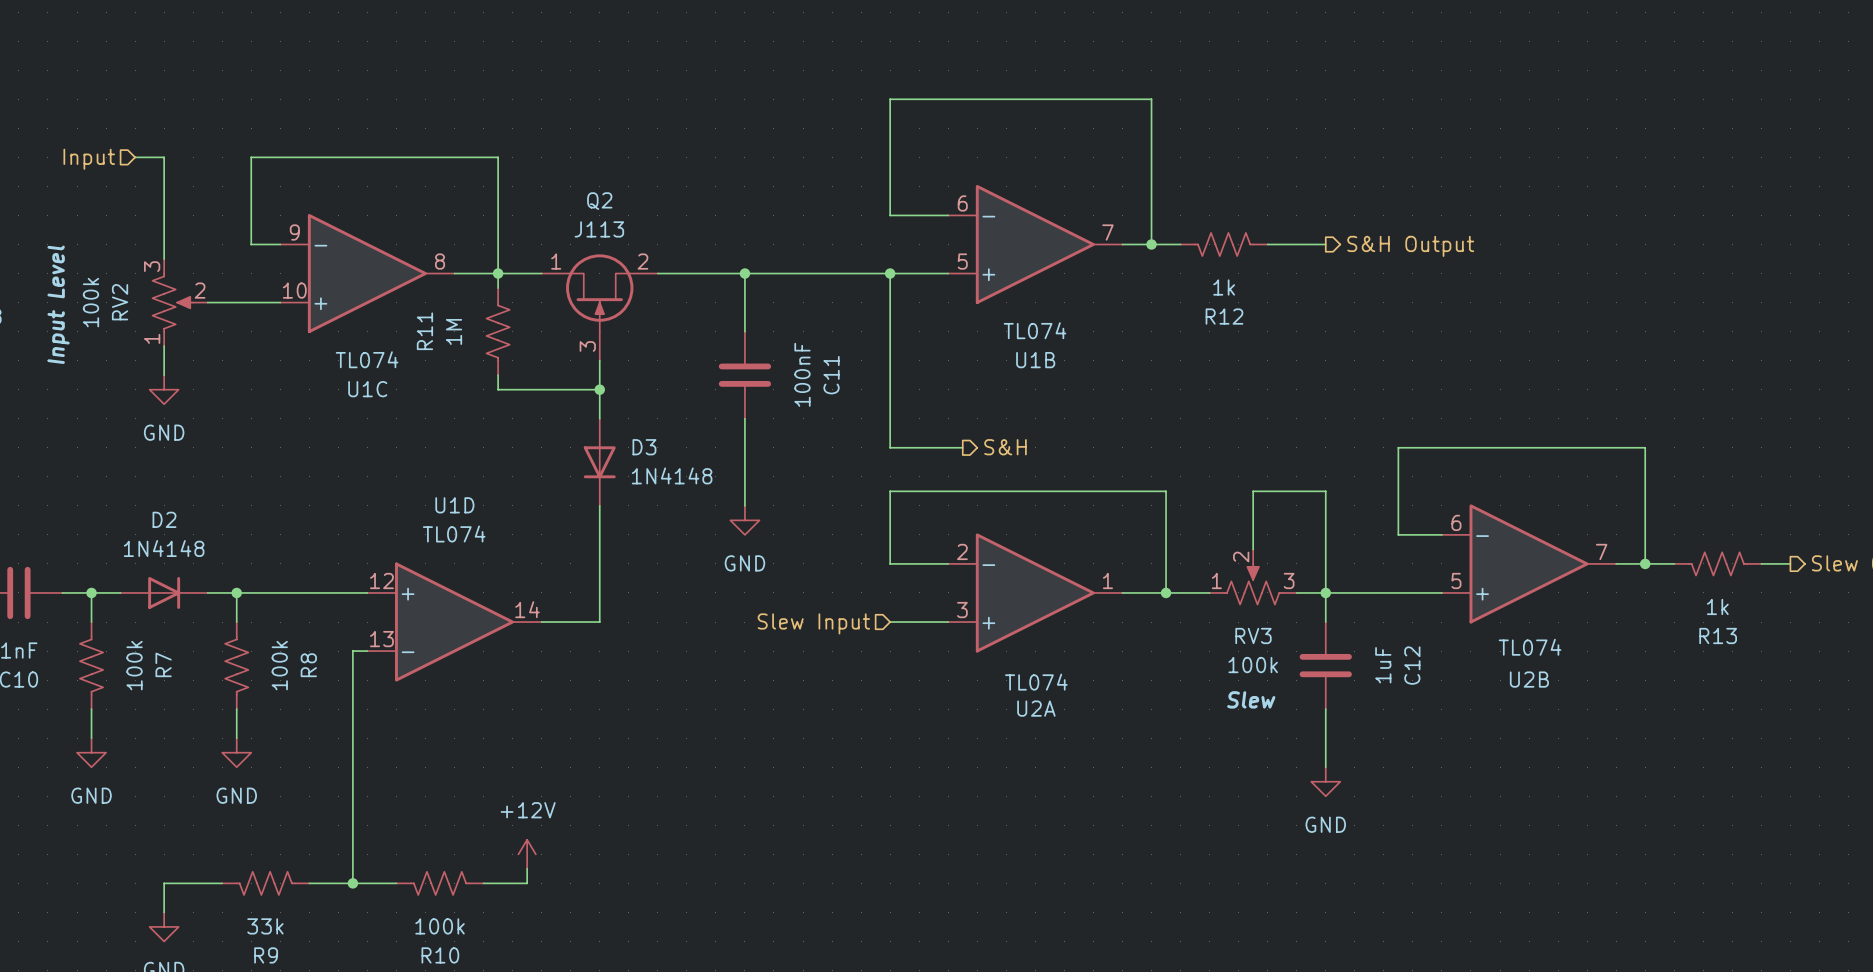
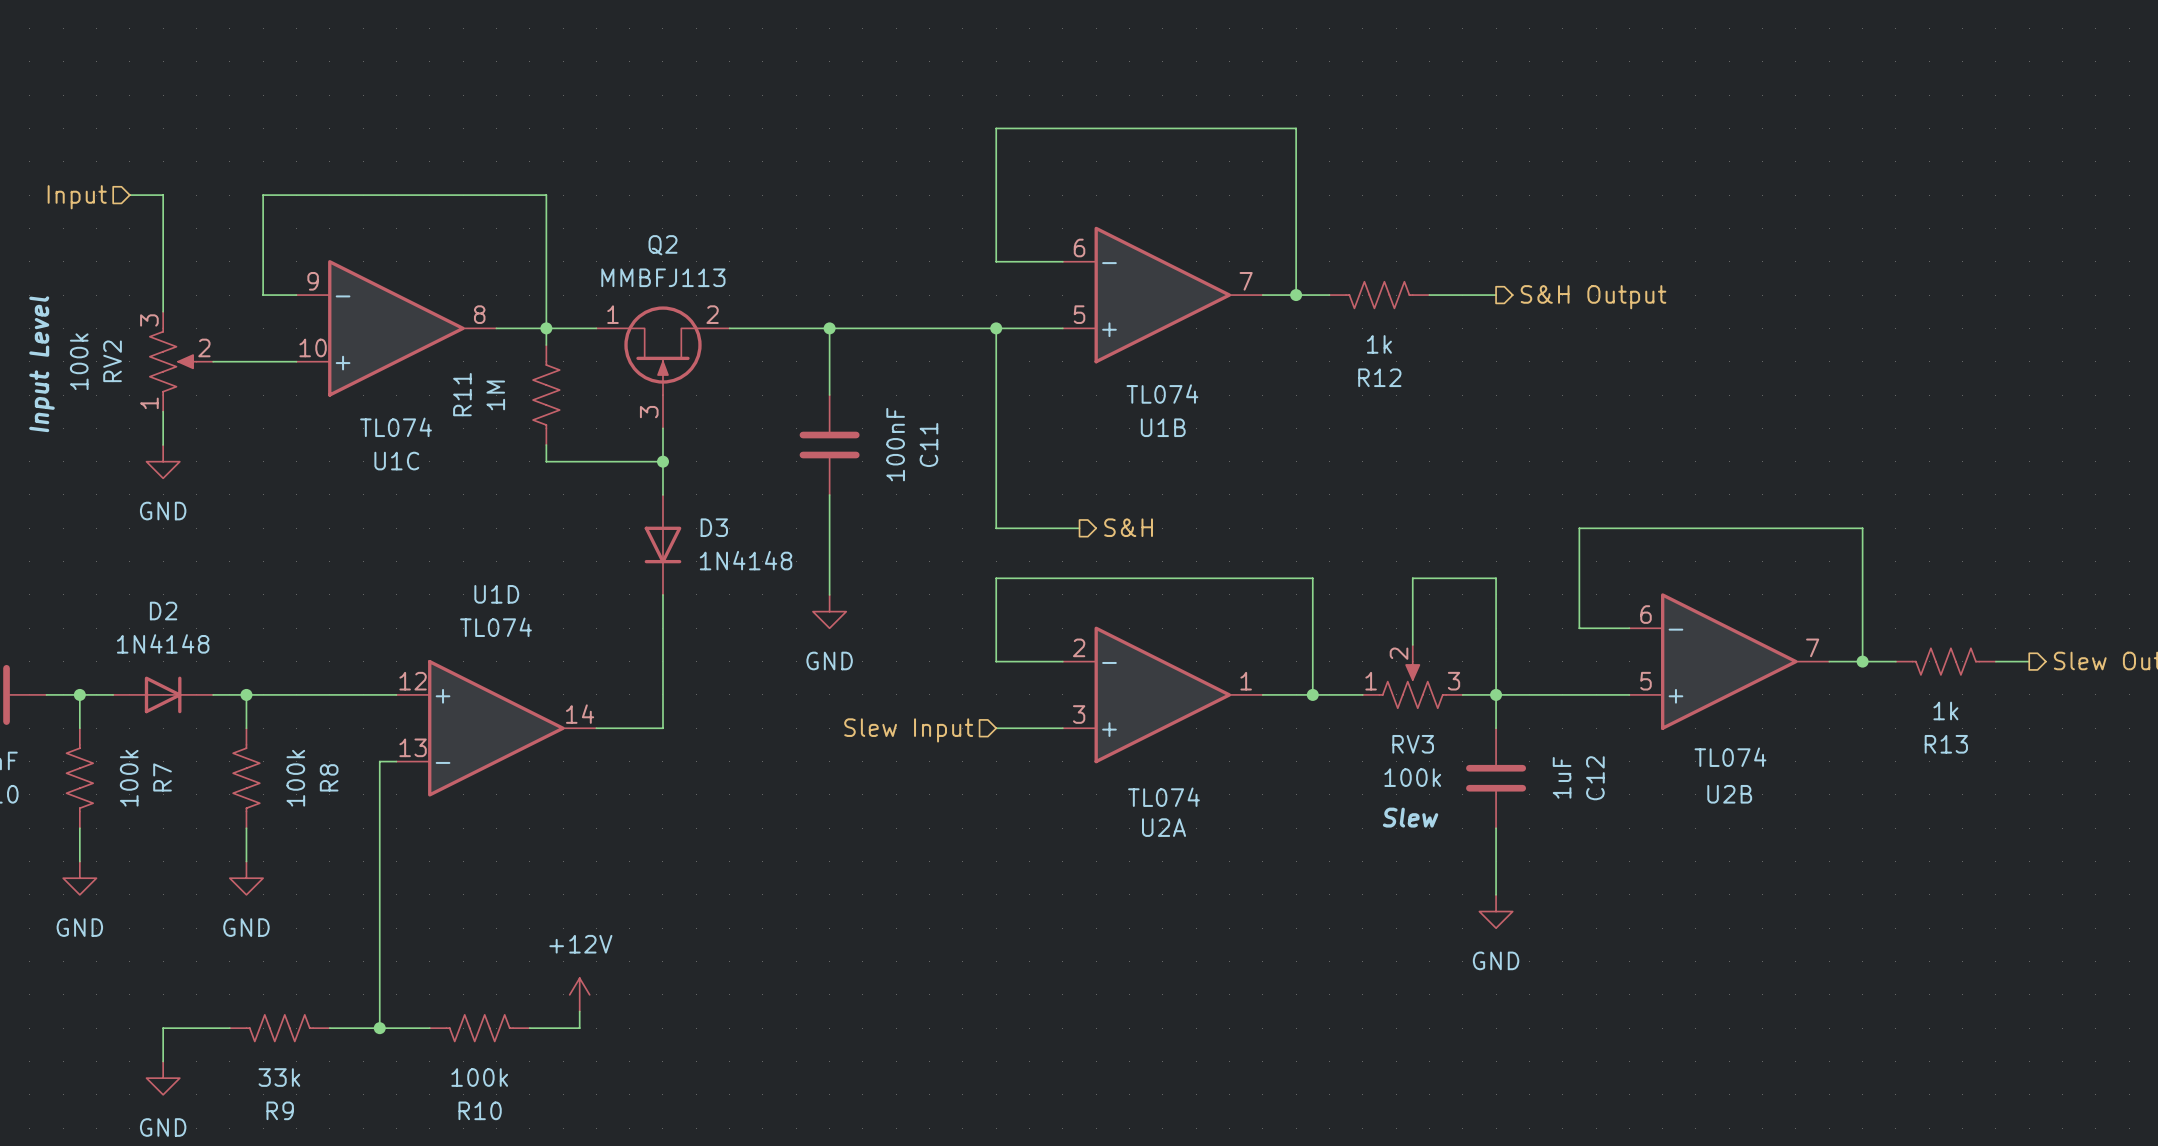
Q2 value: J113 (599, 229) -> MMBFJ113 (663, 277)

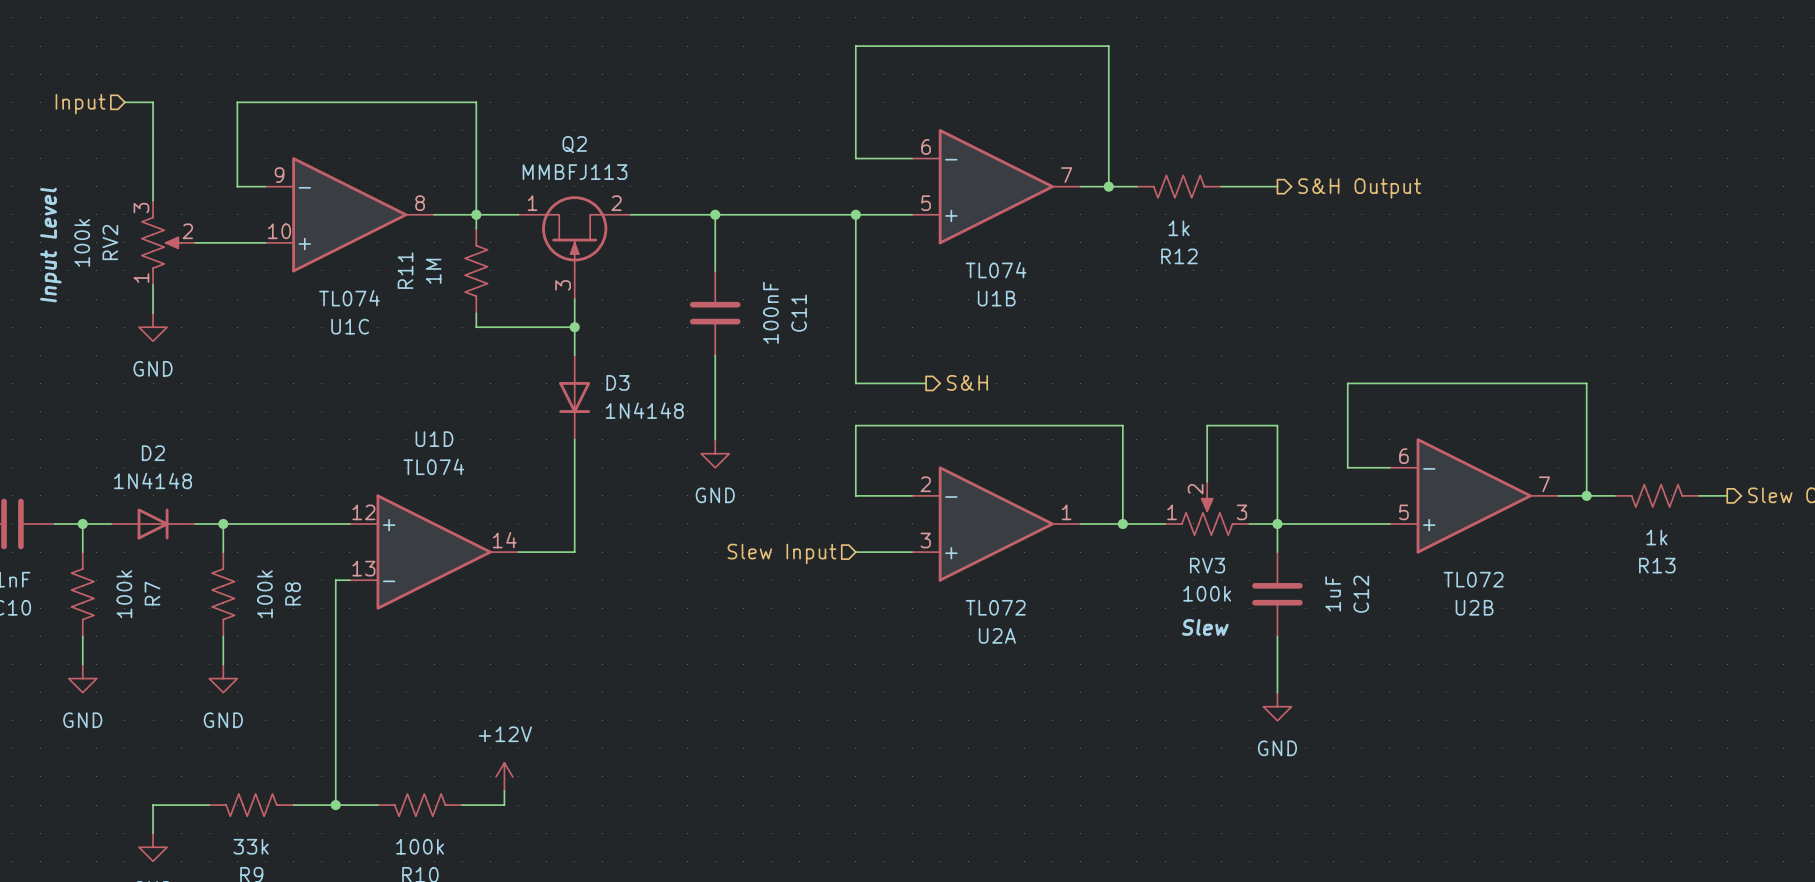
U2B value: TL074 (1730, 757) -> TL072 (1473, 579)
U2A value: TL074 (1163, 797) -> TL072 (995, 607)

